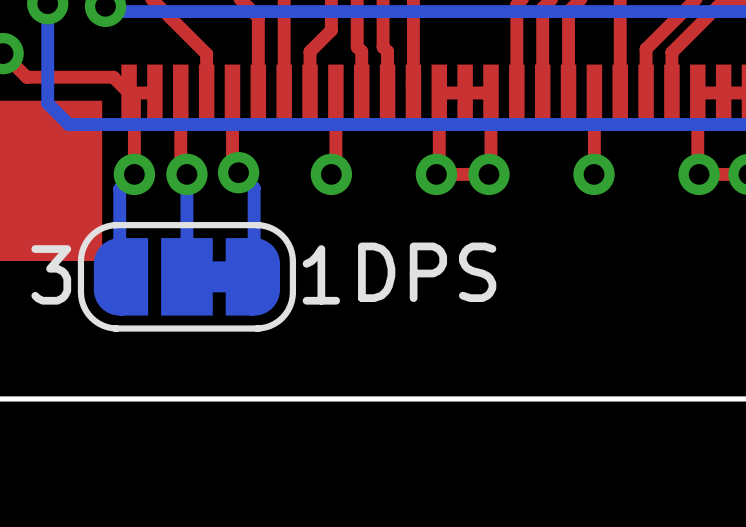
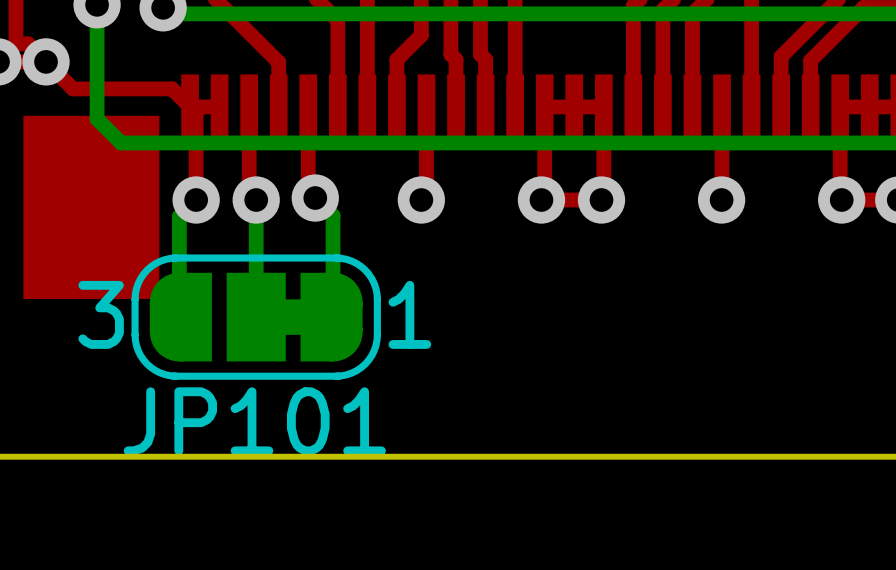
text: DPS (427, 272) -> none
JP101 name: none -> JP101 (254, 421)

